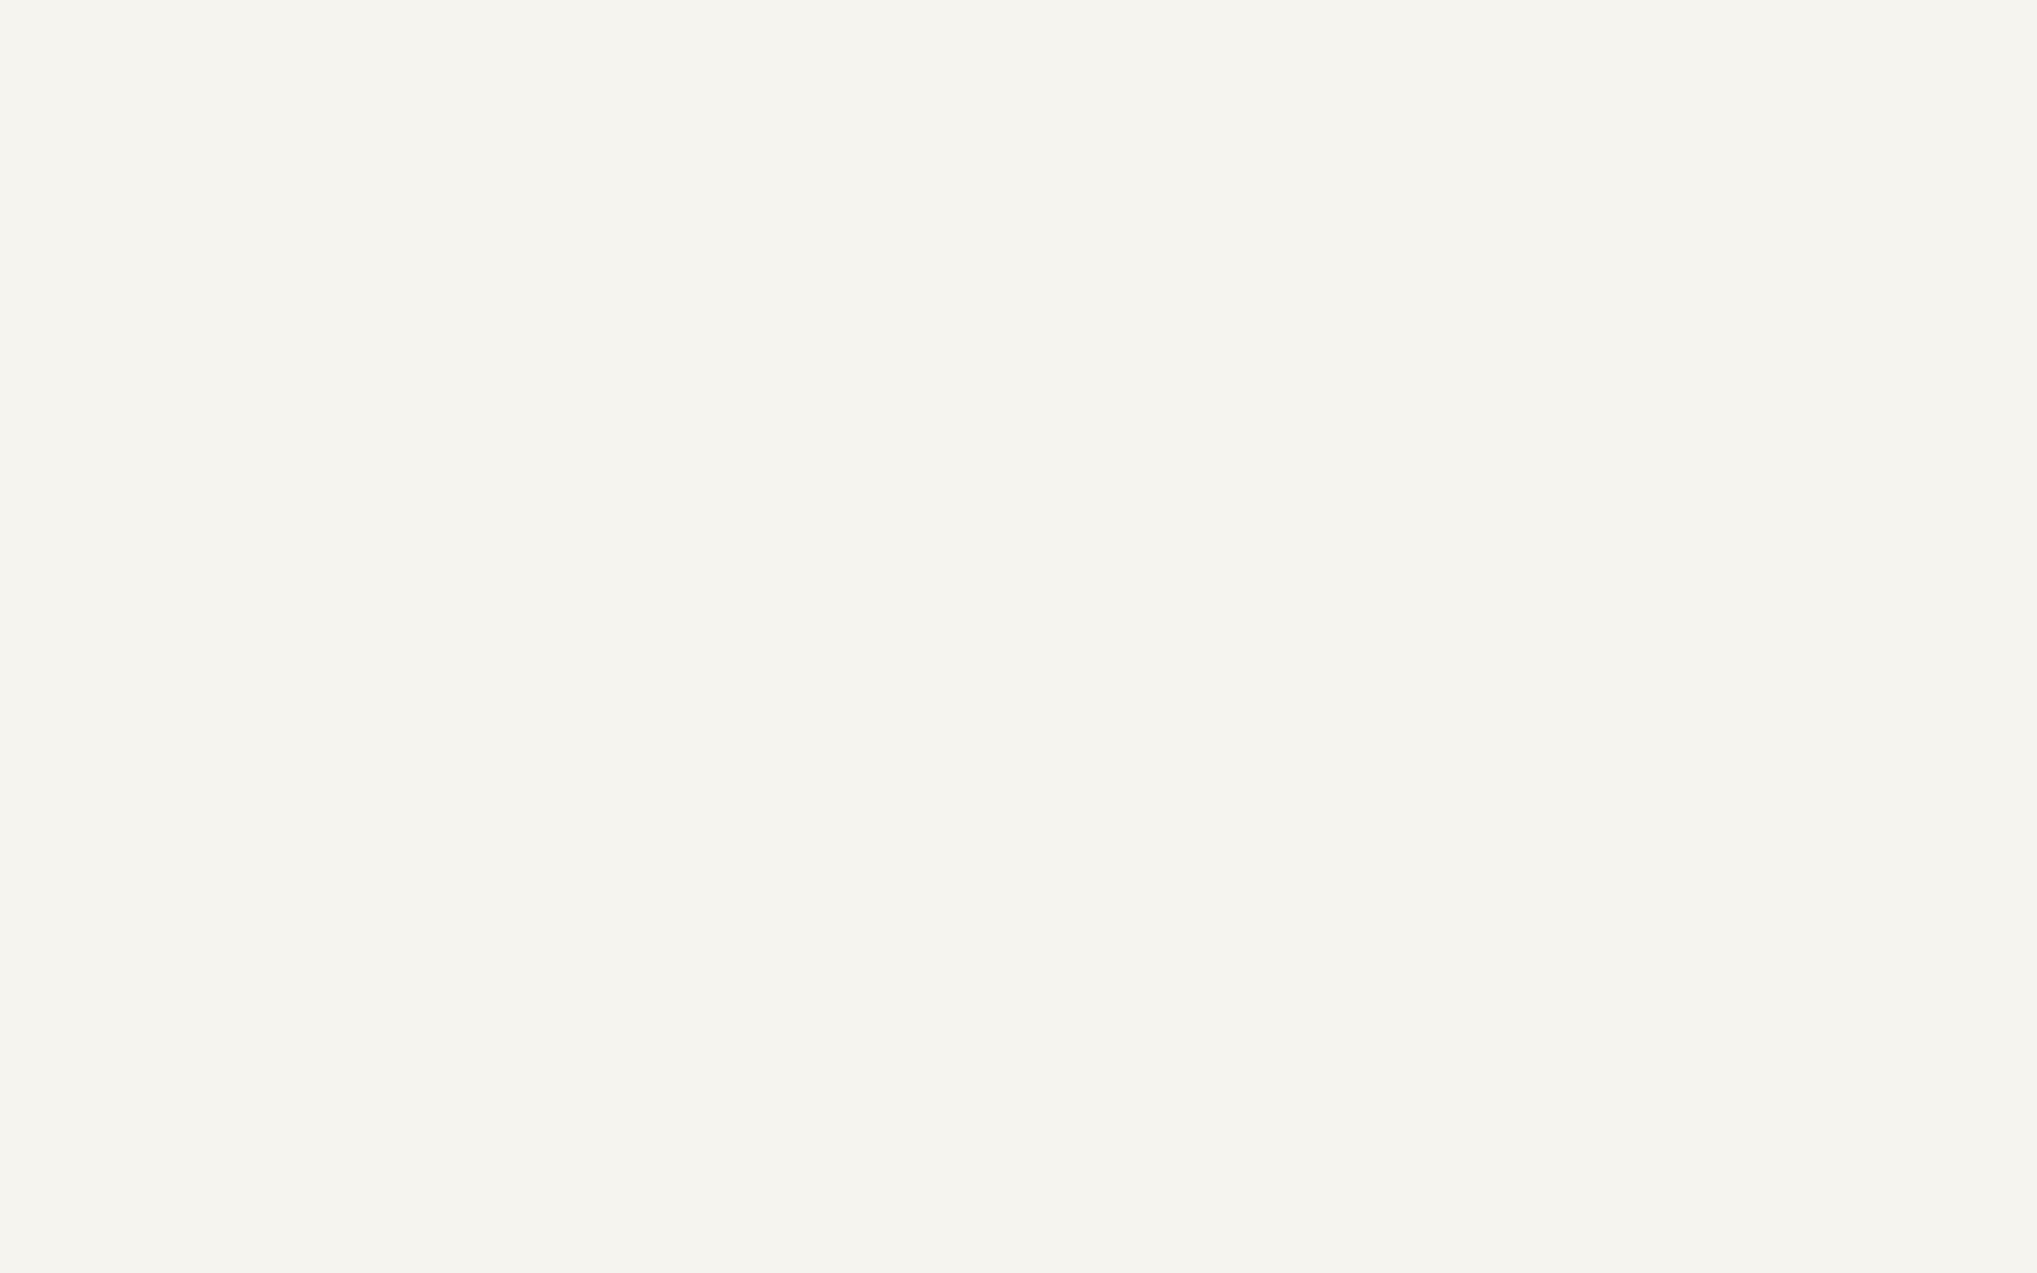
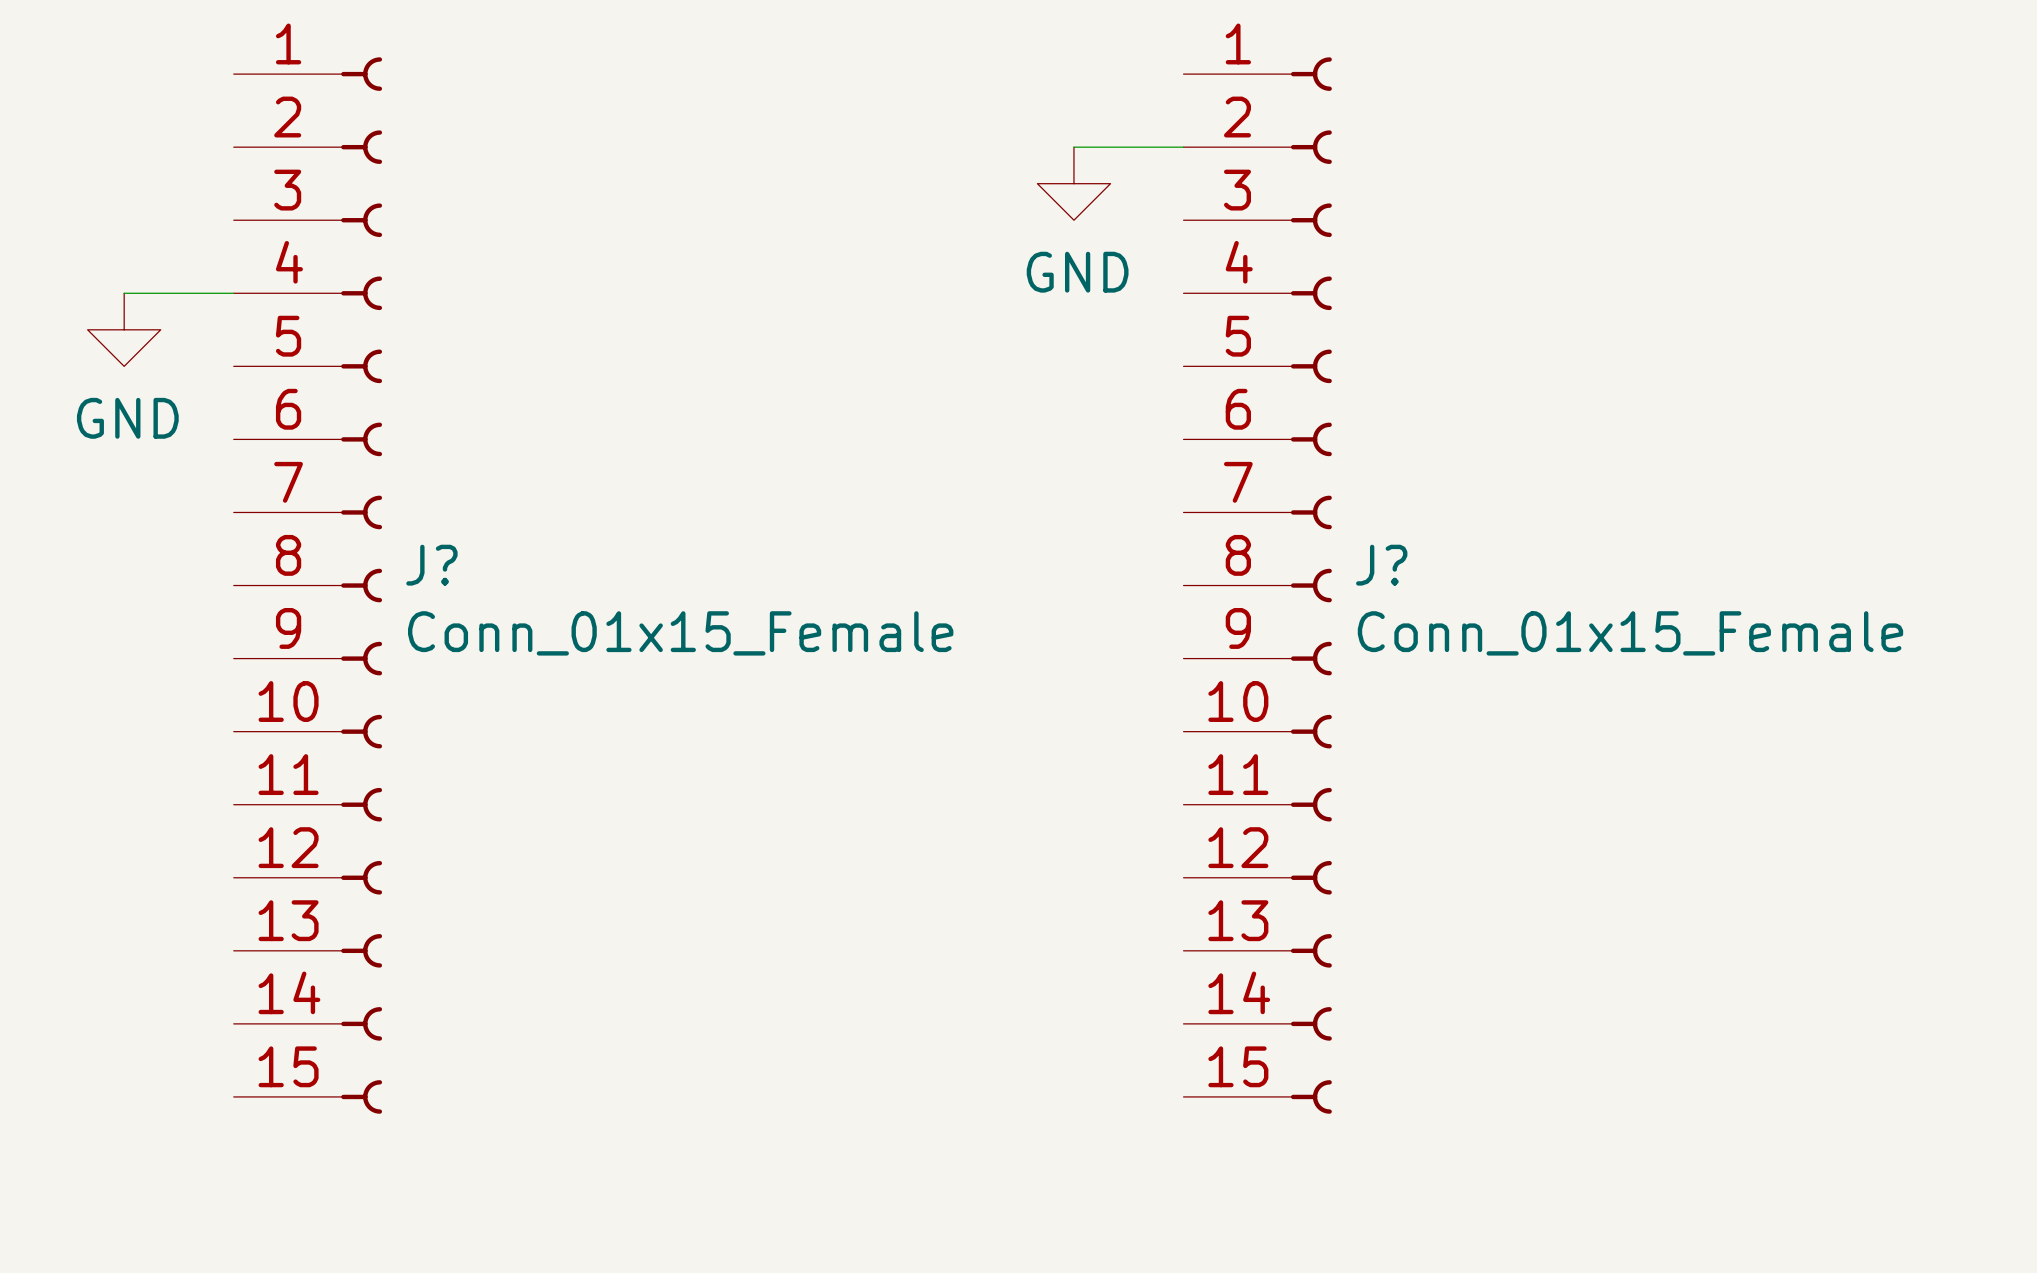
wire: none -> (1073, 147) (1183, 147)
power symbol: none -> GND (1073, 183)
wire: none -> (124, 293) (233, 293)
power symbol: none -> GND (124, 329)
J?: none -> Conn_01x15_Female (307, 585)
J?: none -> Conn_01x15_Female (1257, 585)

